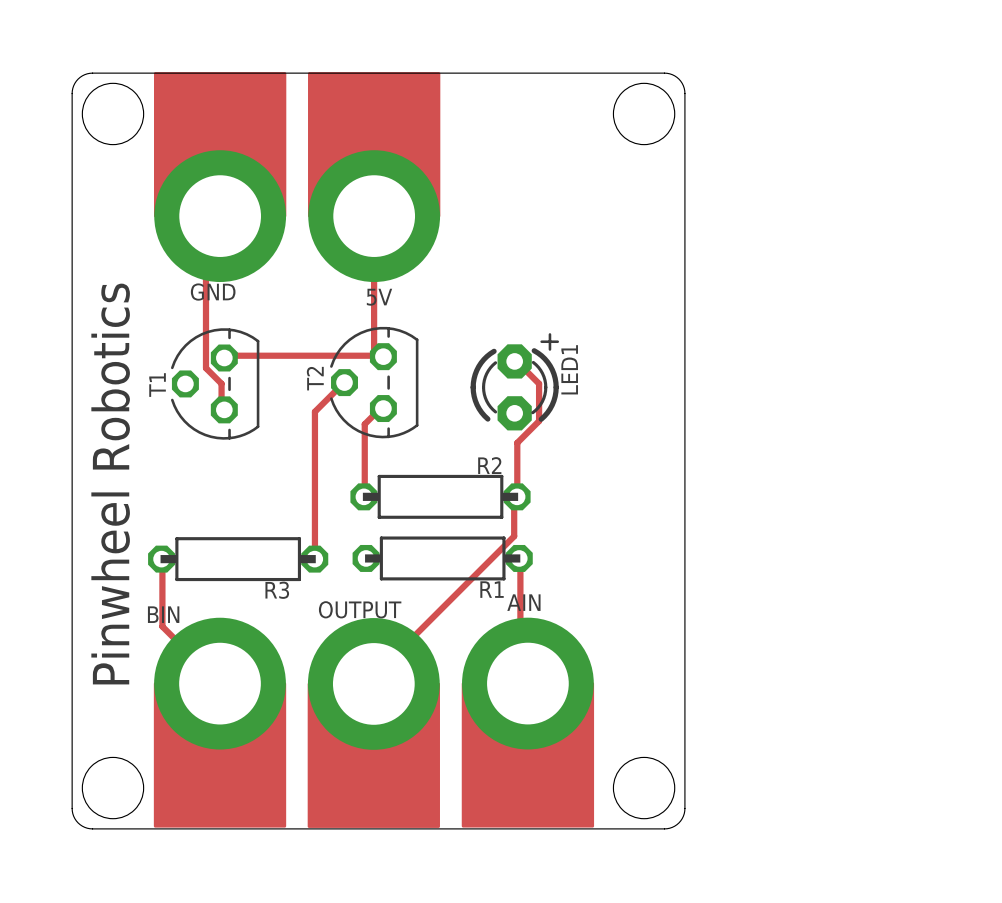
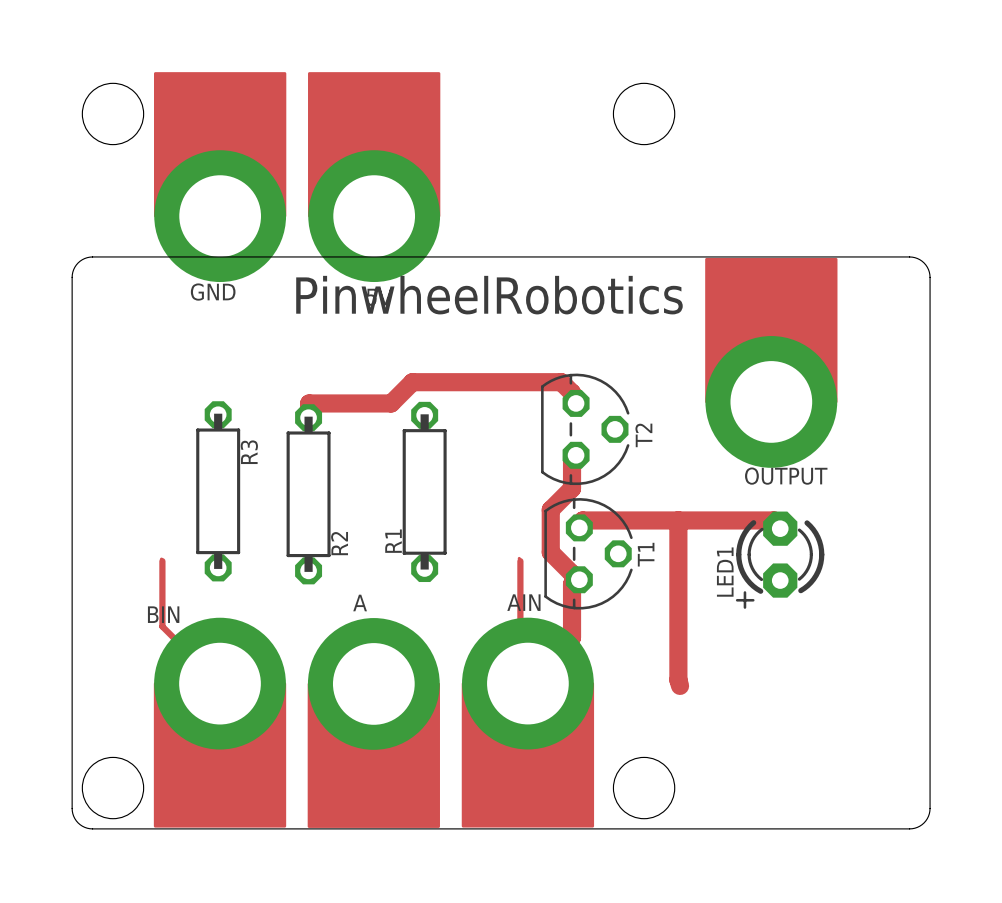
track: (220, 216) (205, 238) (205, 368) (221, 383) (221, 408) (224, 409) -> none
track: (374, 216) (374, 228) (374, 355) (383, 356) (224, 355) (224, 357) -> none
board edge: (72, 277) (72, 90) (76, 81) (87, 73) (664, 73) (672, 74) (678, 79) (683, 85) (684, 93) (684, 808) (683, 816) (678, 822) (672, 827) (664, 828) -> (72, 277) (73, 269) (78, 262) (84, 258) (92, 256) (909, 256) (917, 258) (924, 262) (928, 269) (930, 277) (930, 808) (928, 816) (922, 824) (909, 828) (664, 828)
text: none -> PinwheelRobotics (489, 295)
T1 footprint: [170, 328, 260, 440] -> [544, 498, 633, 610]
track: (514, 361) (539, 383) (539, 421) (517, 442) (517, 495) (514, 498) (514, 536) (374, 676) (373, 683) -> none
OUTPUT: none -> (771, 362)
LED1 rotation: 0° (514, 381) -> 180° (780, 560)
LED1 position: (514, 381) -> (780, 560)
track: (344, 382) (314, 411) (314, 559) -> none
T2 rotation: 0° (374, 382) -> 180° (585, 429)
T2 position: (374, 382) -> (585, 429)
T1 name position: T1 (157, 385) -> T1 (646, 554)
track: none -> (576, 403) (572, 392) (561, 382) (412, 382) (391, 403) (309, 403) (308, 417)
track: (383, 408) (380, 408) (364, 424) (363, 496) -> none
track: none -> (576, 455) (572, 456) (572, 488) (550, 509) (550, 552) (579, 579) (572, 584) (572, 637) (525, 685)
text: Pinwheel Robotics (110, 484) -> none
R2 rotation: 0° (440, 496) -> 90° clockwise (308, 494)
R2 position: (440, 496) -> (308, 494)
track: none -> (678, 520) (678, 680) (680, 685)
track: none -> (579, 527) (582, 520) (774, 520) (780, 528)
R1 rotation: 0° (442, 558) -> 90° clockwise (424, 491)
R3 rotation: 0° (238, 559) -> 90° counterclockwise (218, 491)
OUTPUT name: OUTPUT (360, 609) -> A (360, 603)

